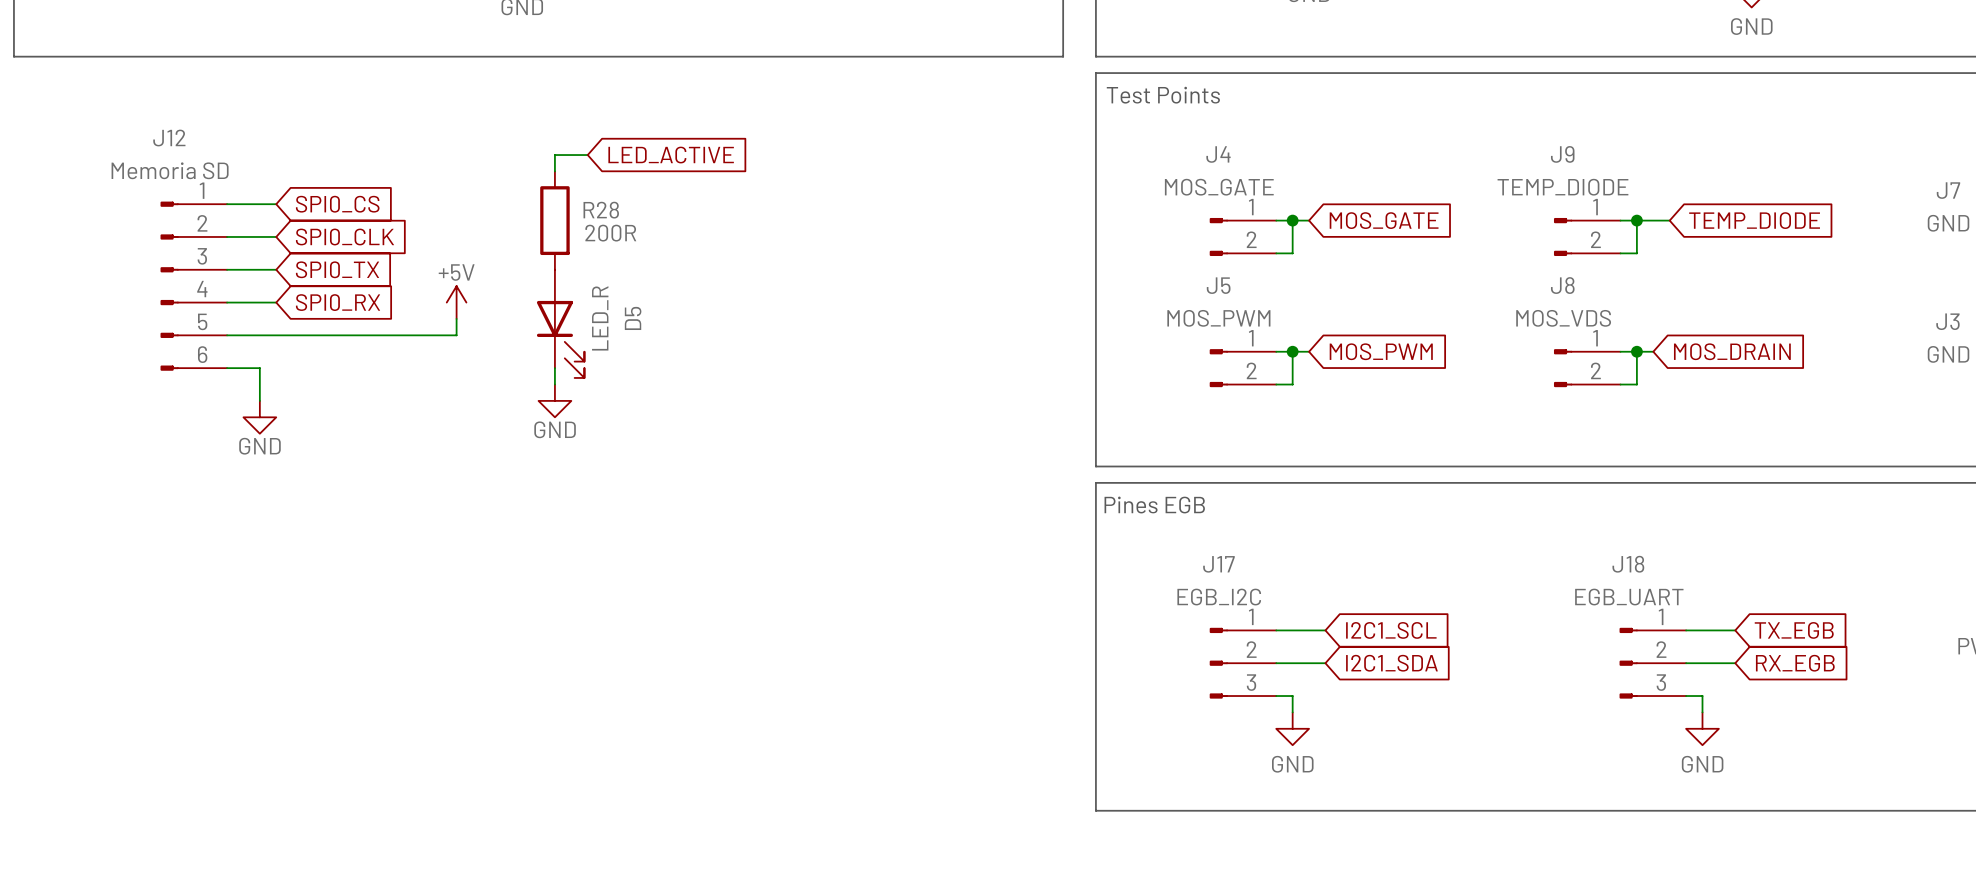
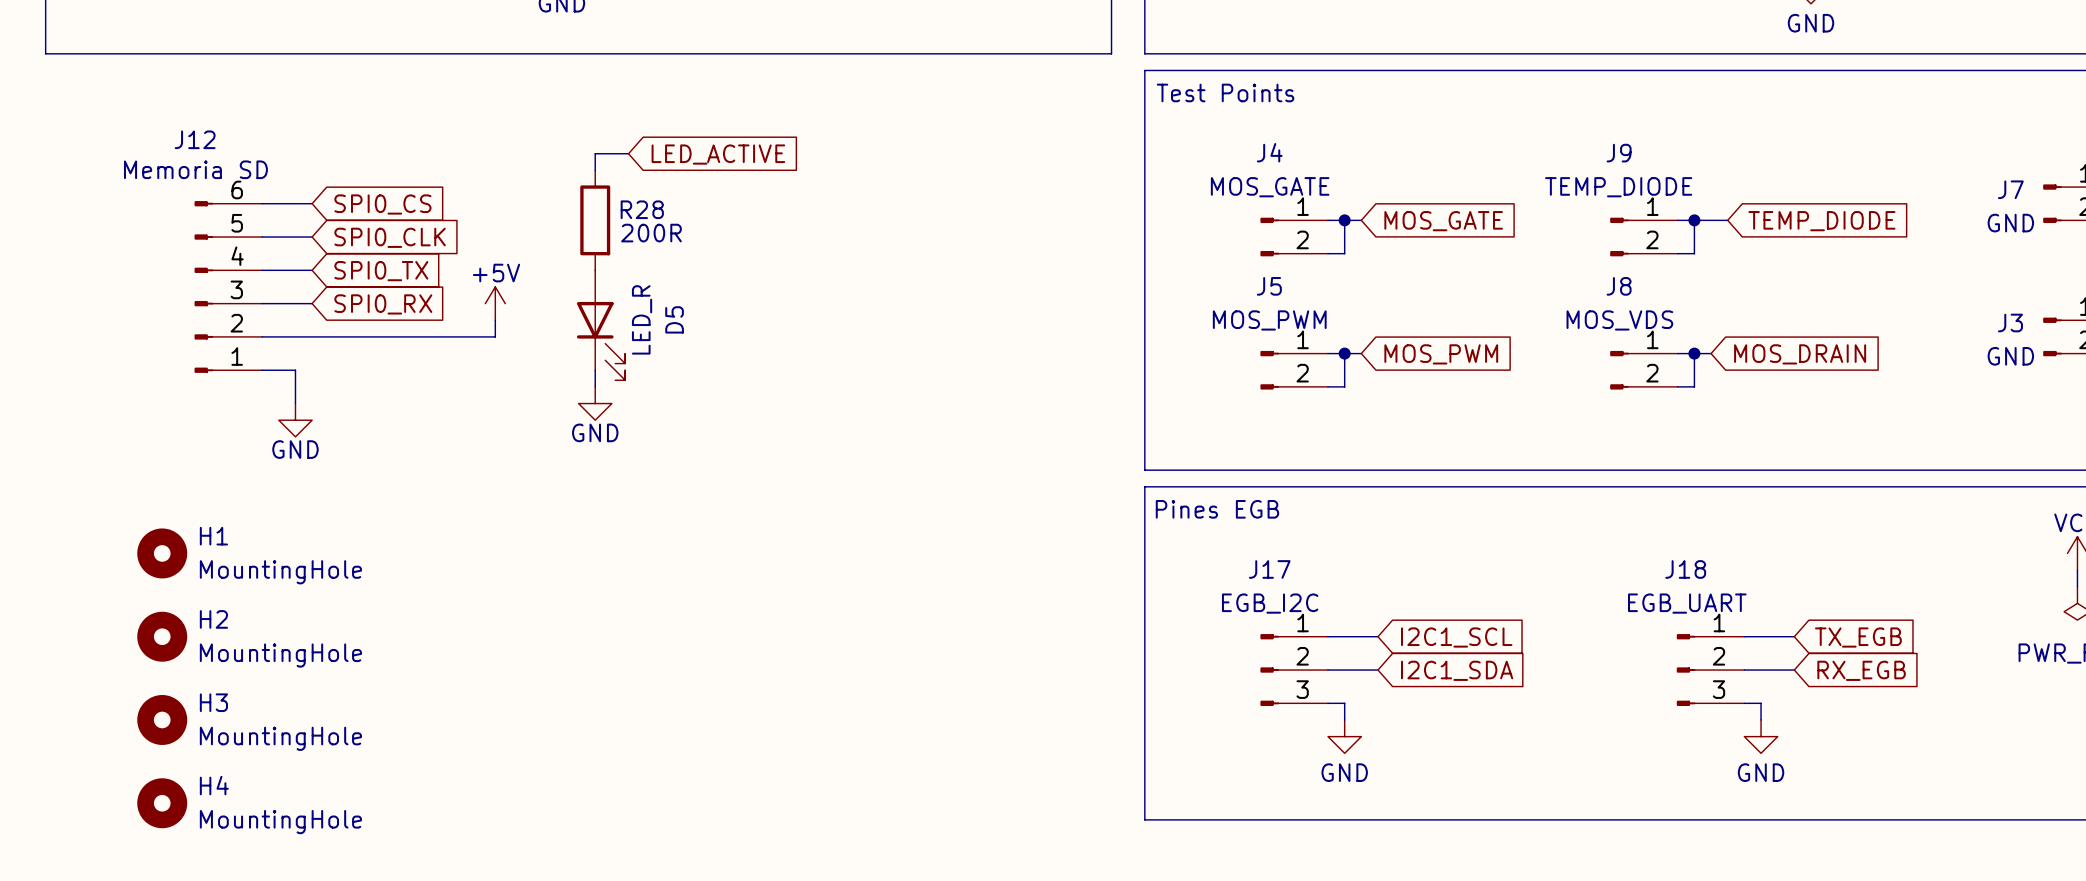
J12 flip: as is (169, 286) -> up-down (203, 286)
H1: none -> MountingHole (162, 553)
H2: none -> MountingHole (162, 636)
H3: none -> MountingHole (162, 719)
H4: none -> MountingHole (162, 803)

